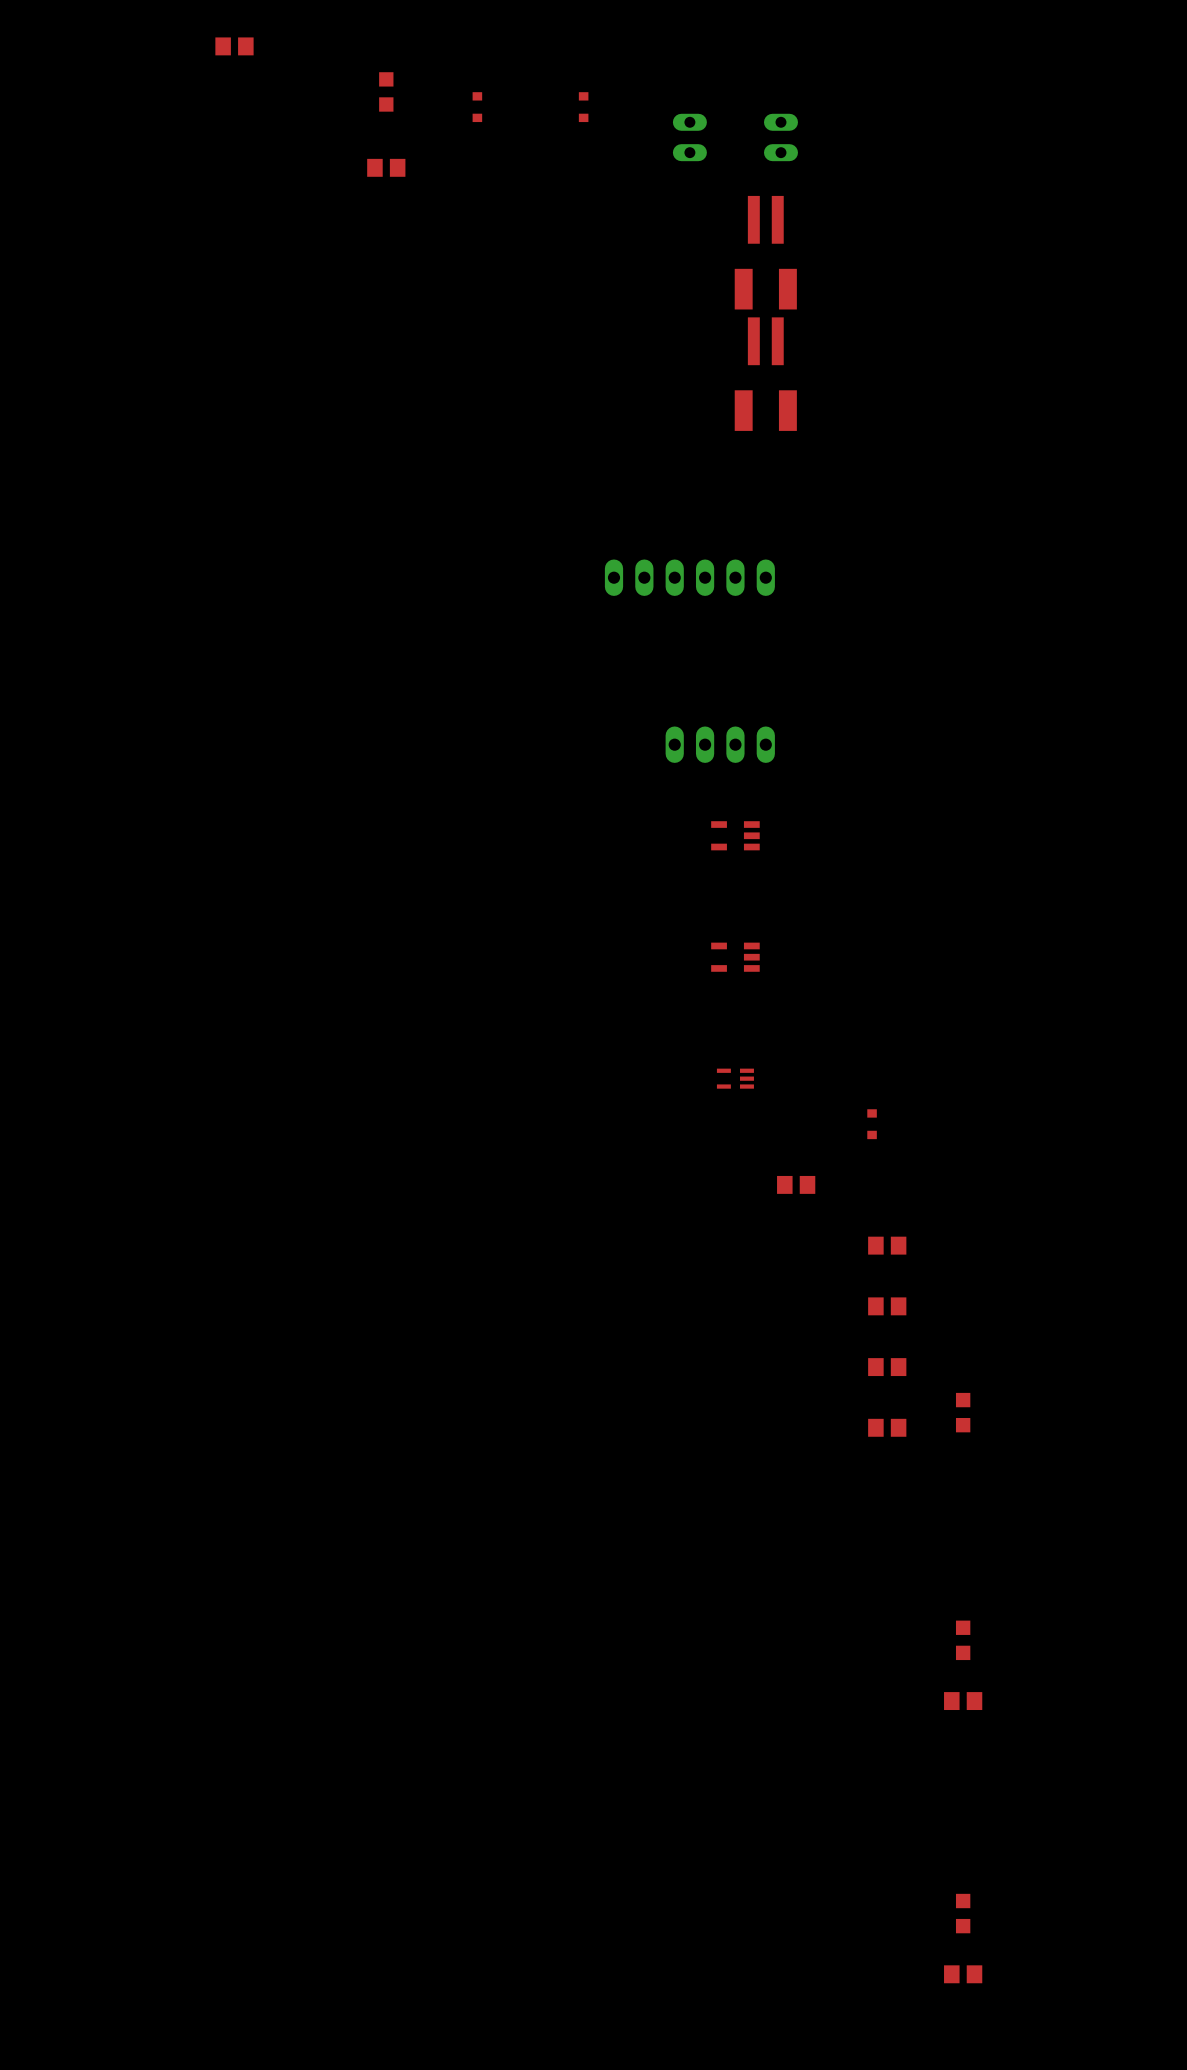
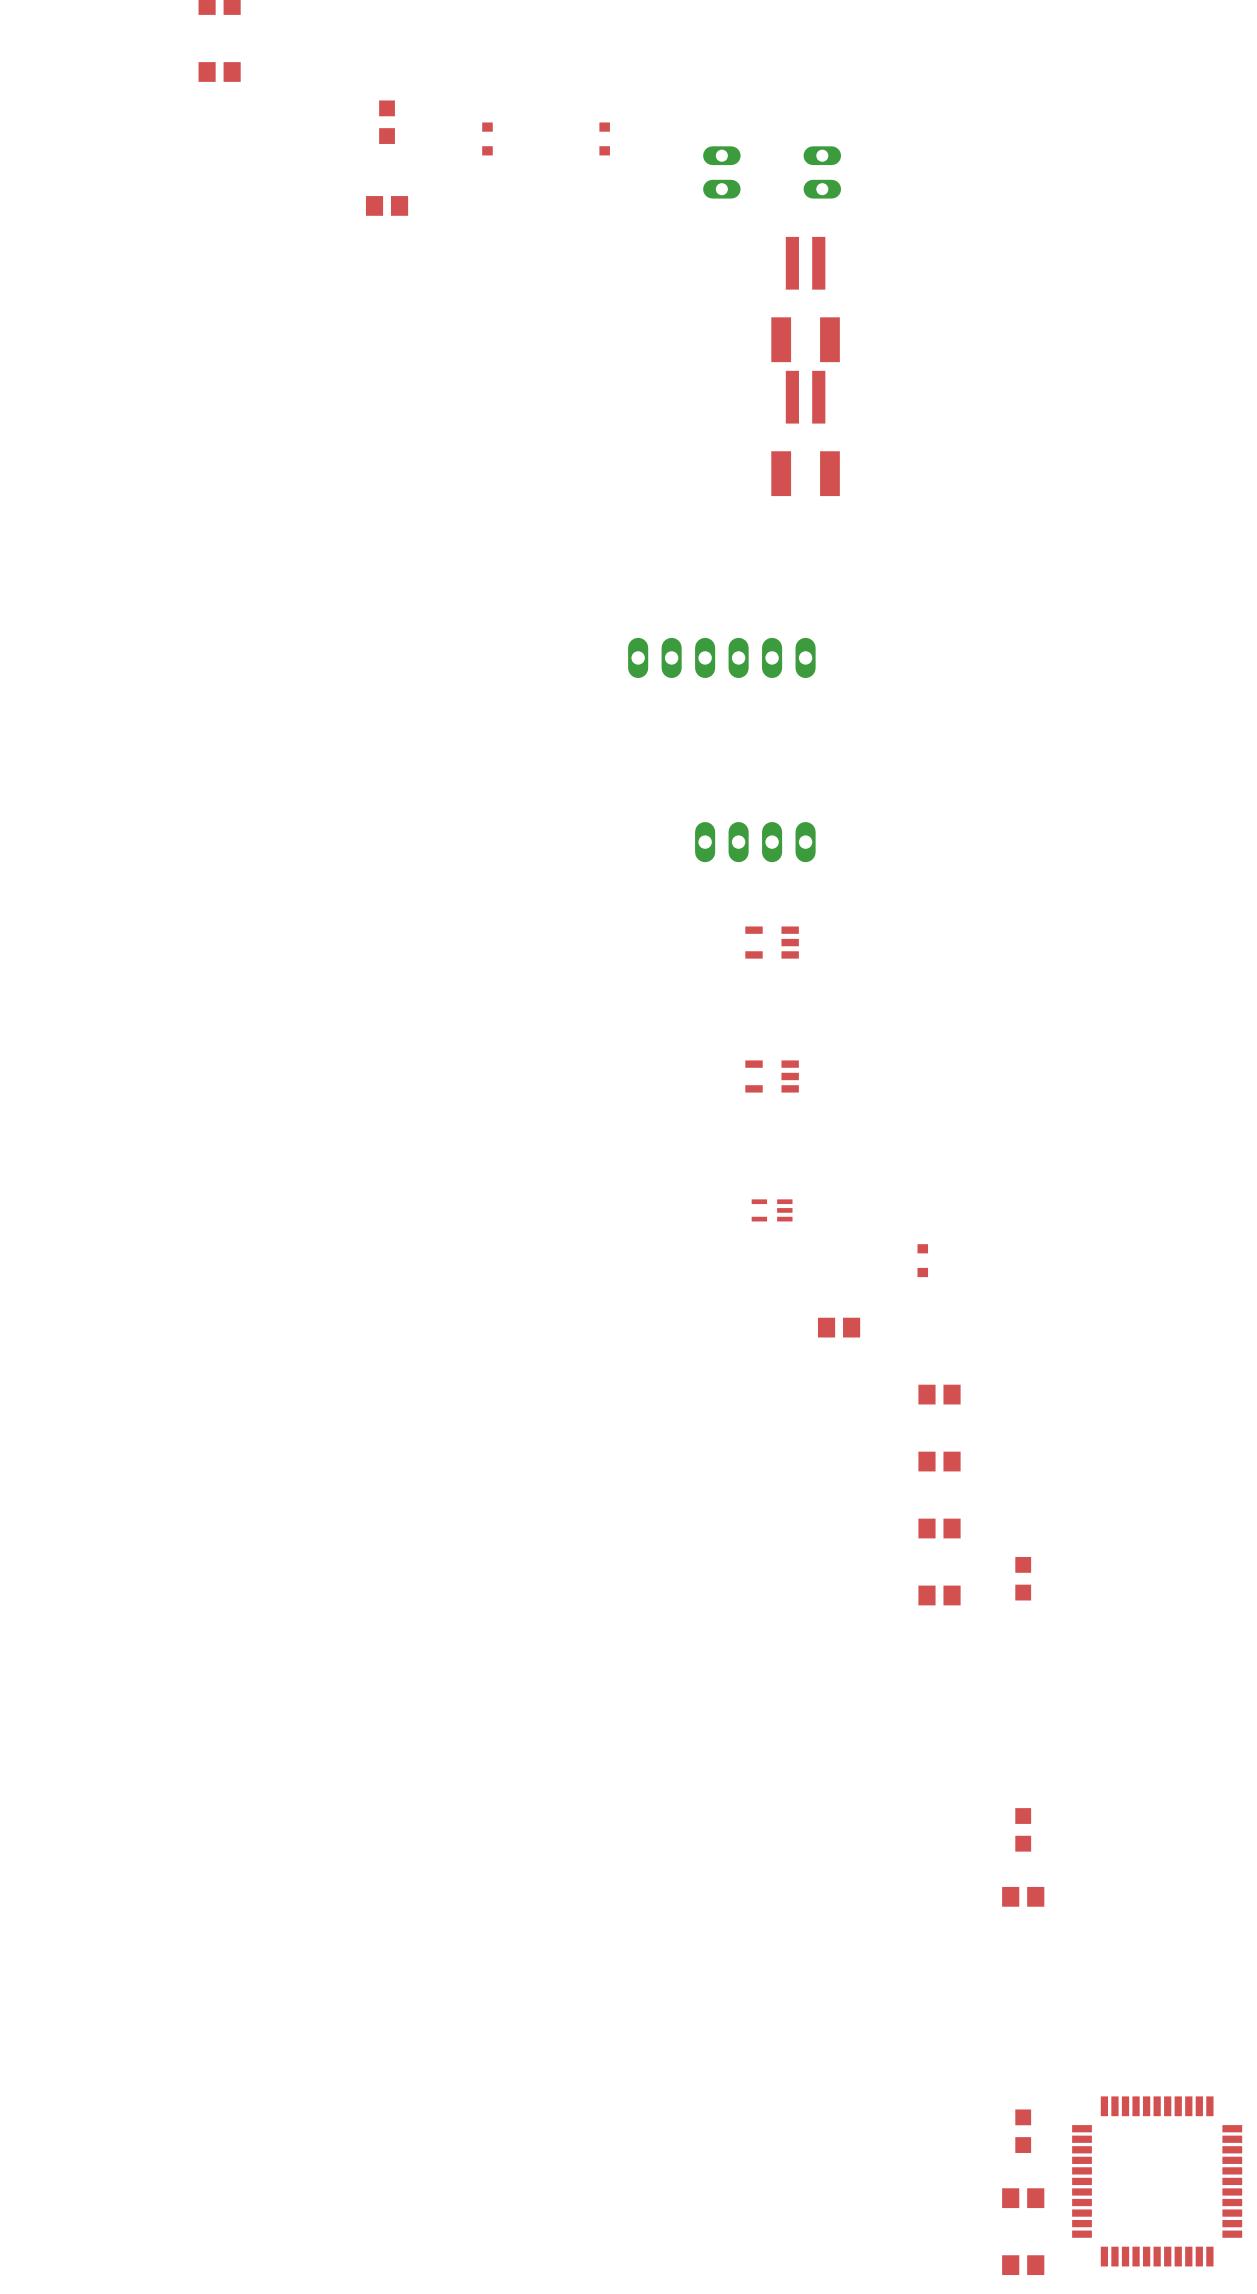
part: none -> (1157, 2181)
part: none -> (1023, 2265)

